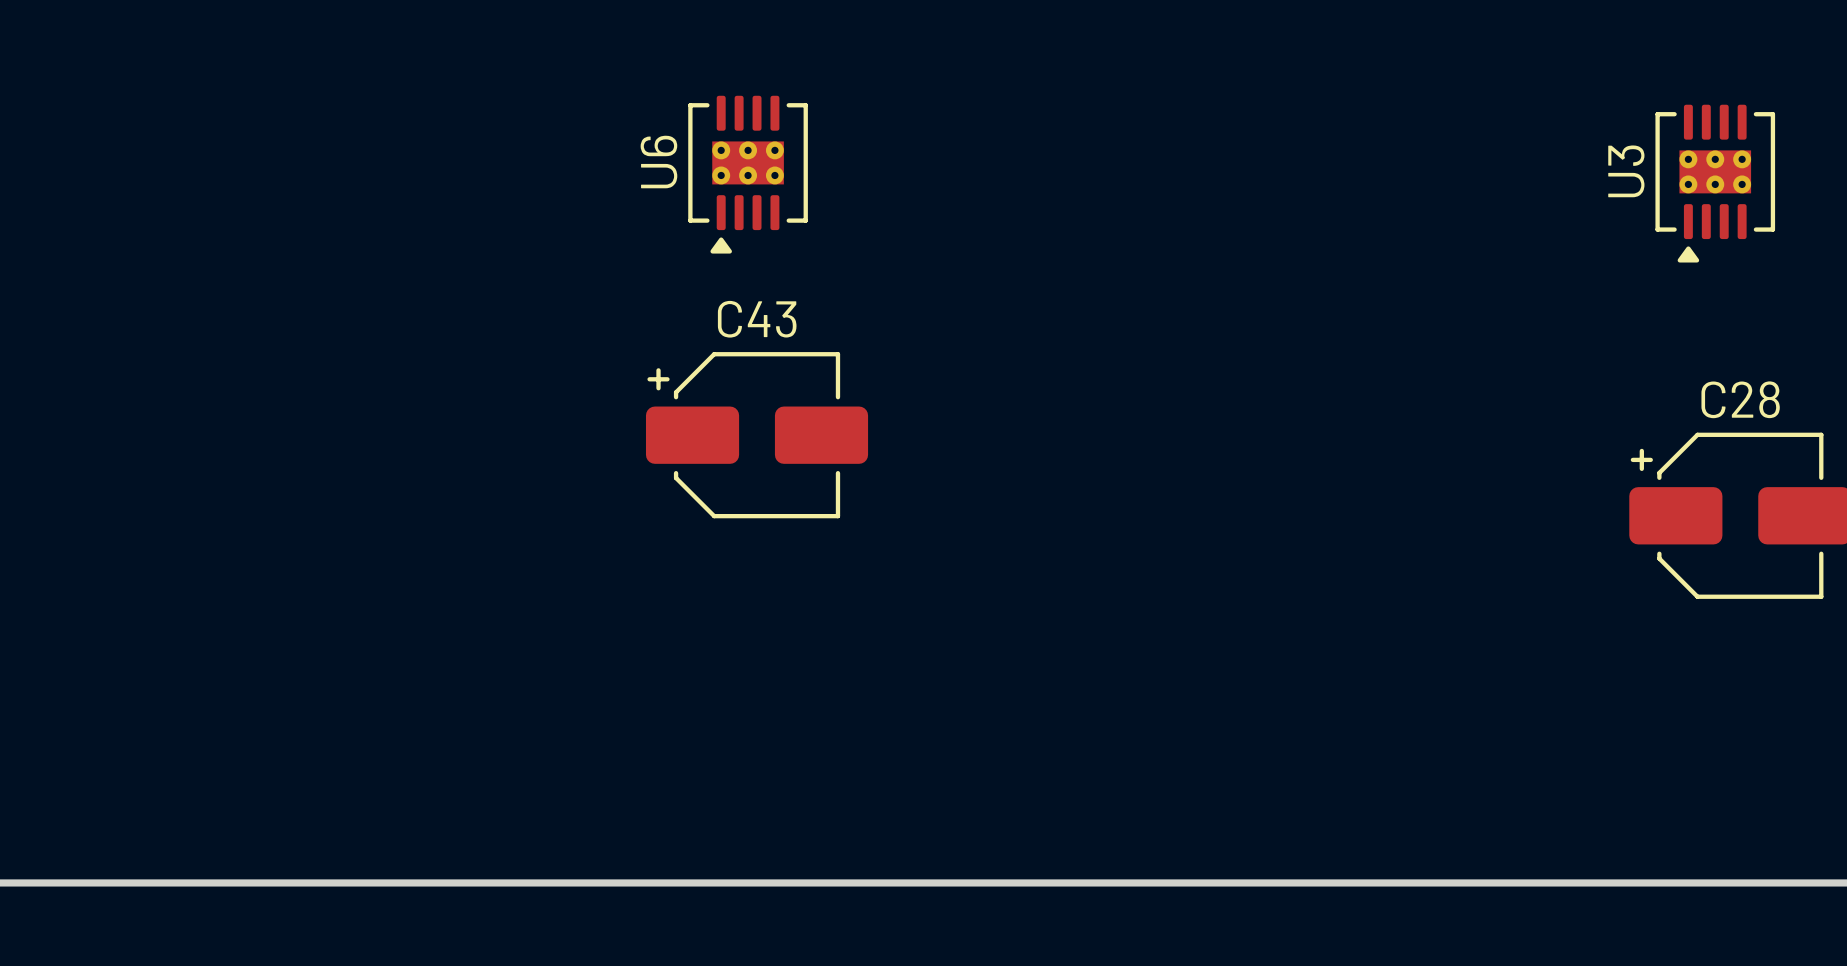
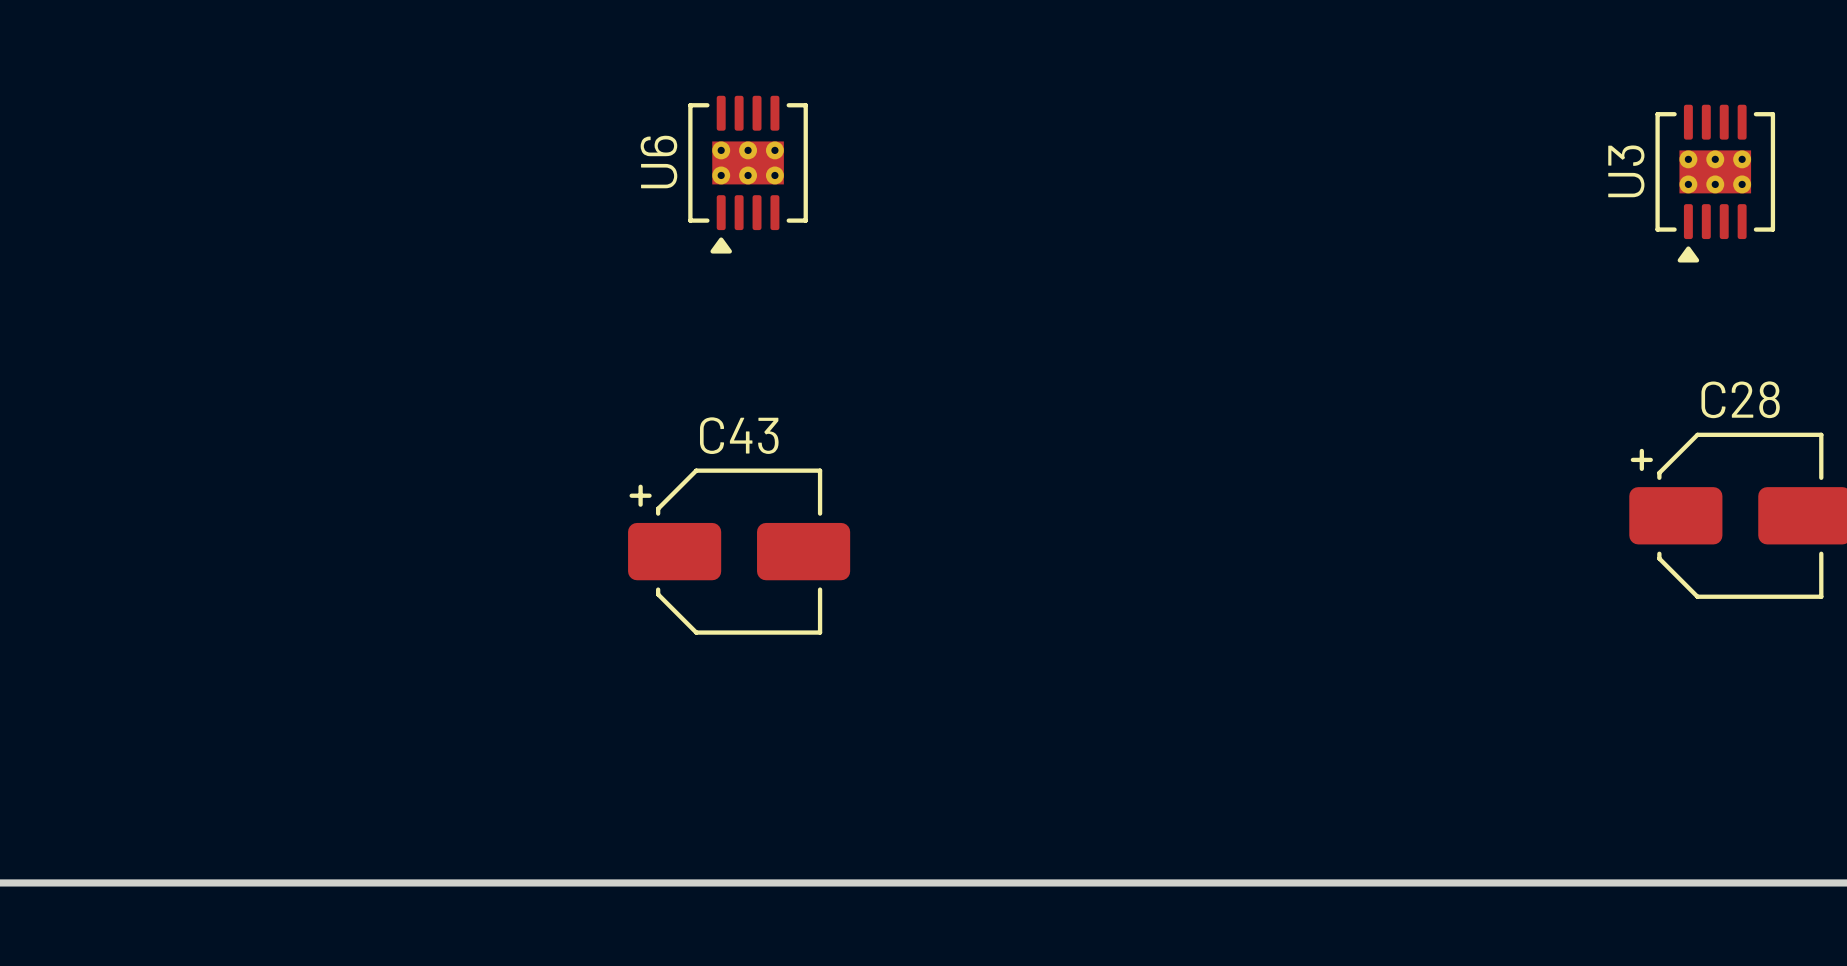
C43 position: (757, 435) -> (739, 551)

